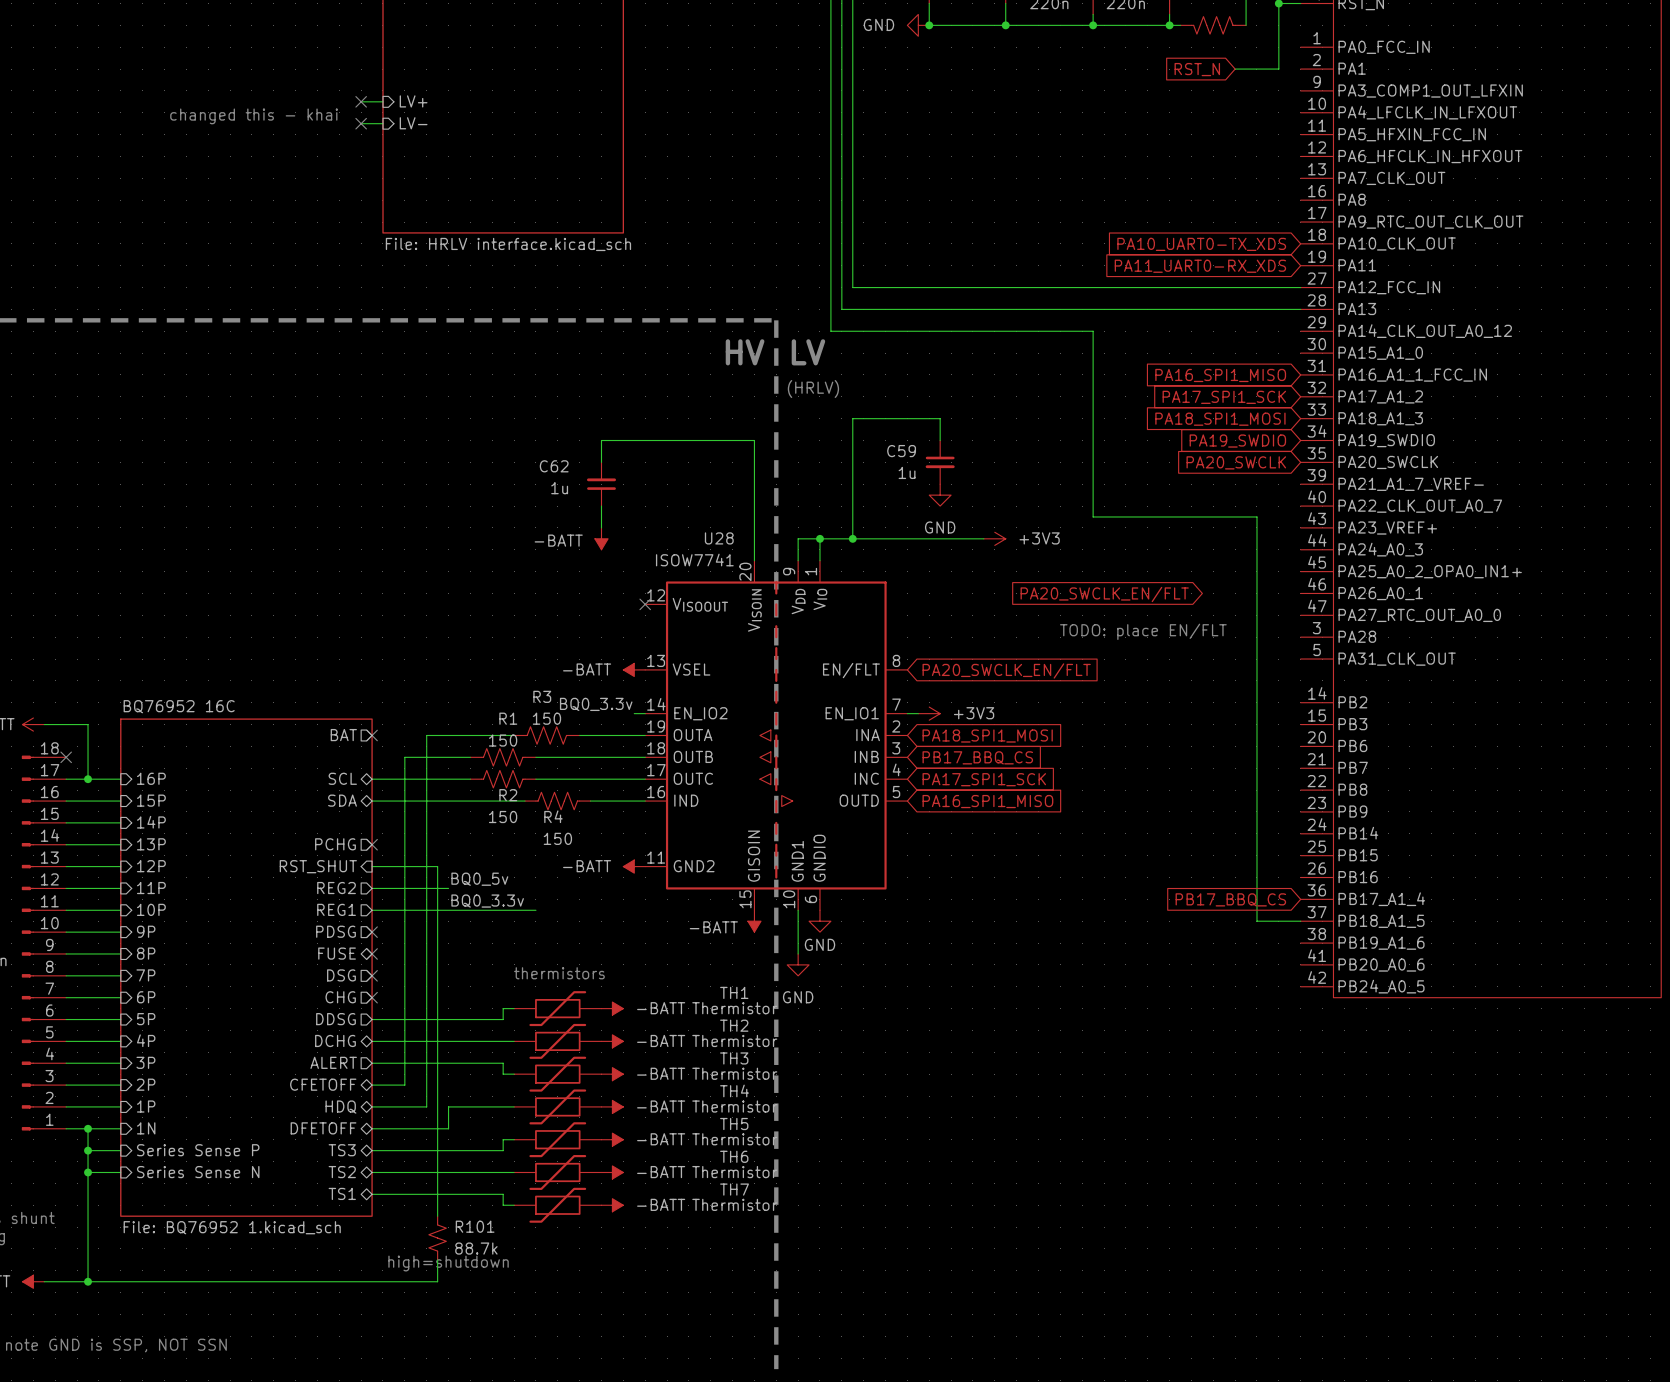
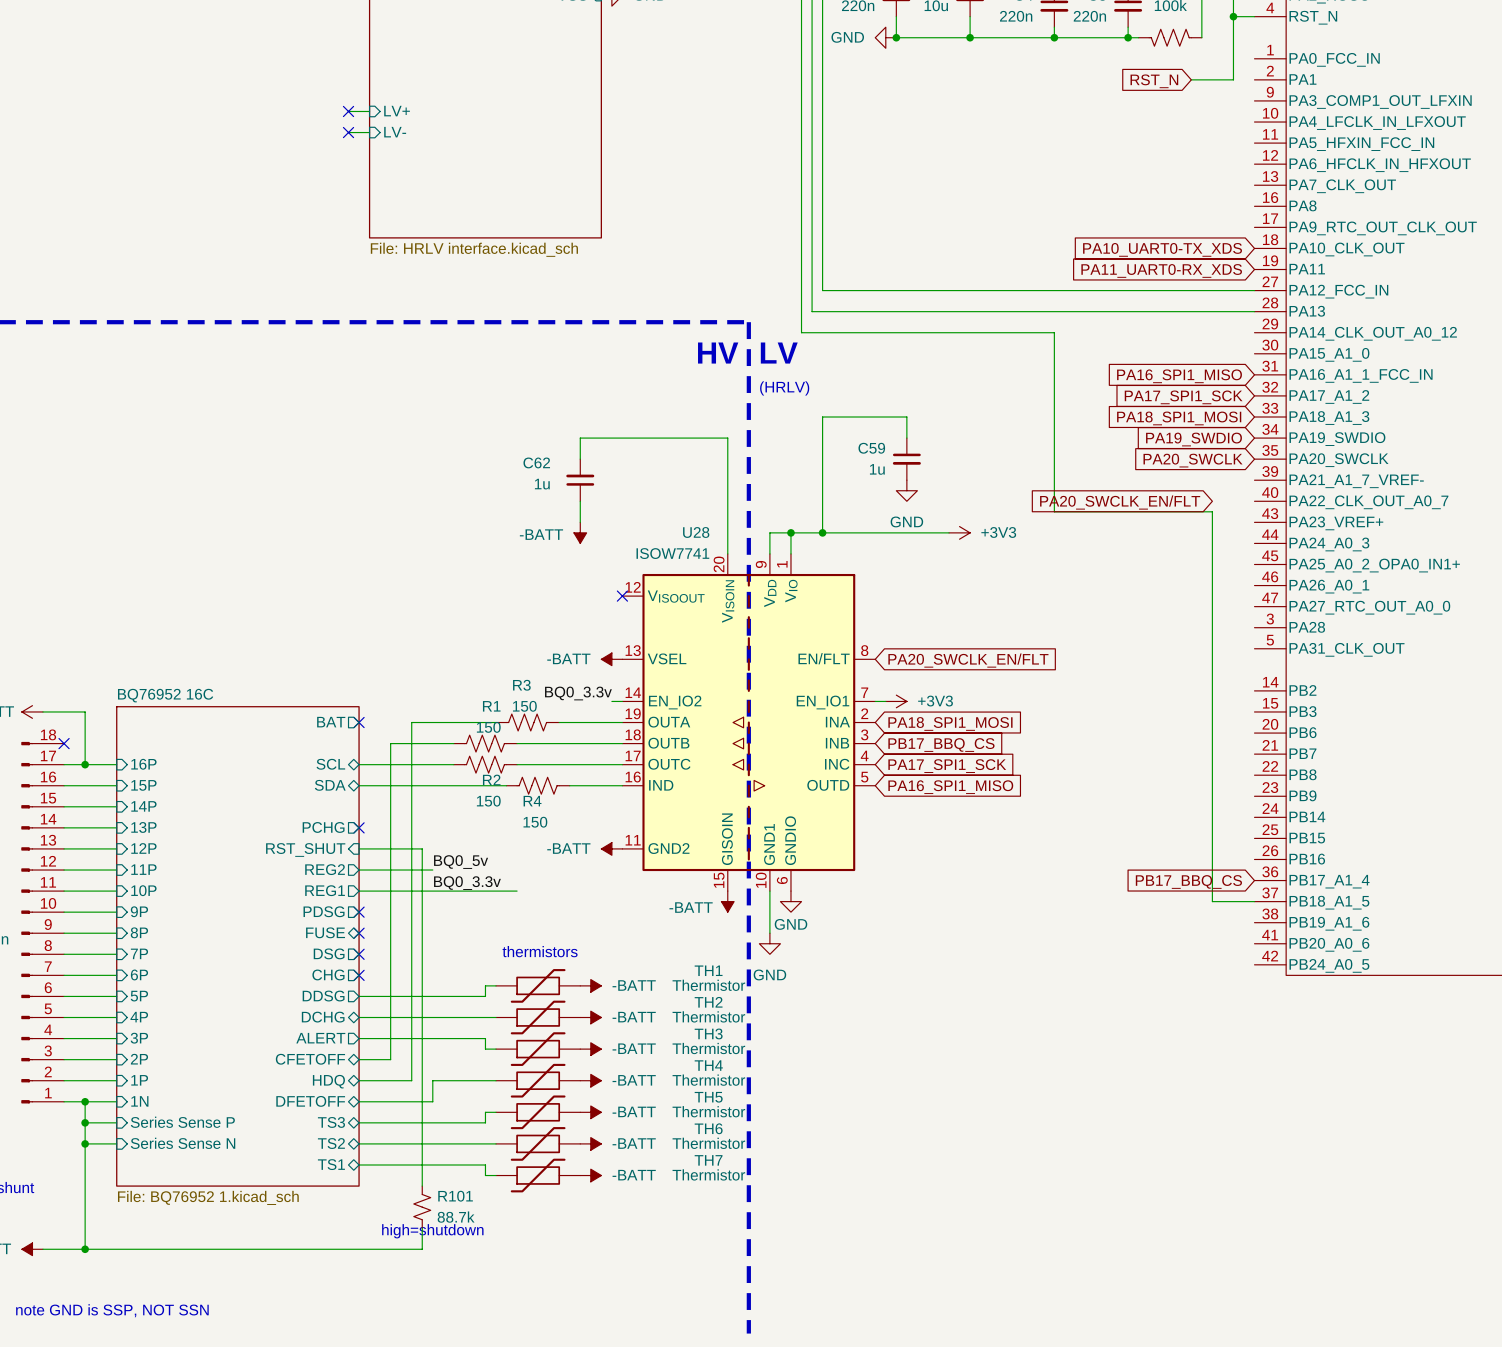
text: changed this - khai (254, 116) -> none
global label position: PA20_SWCLK_EN/FLT (1104, 594) -> PA20_SWCLK_EN/FLT (1120, 502)
text: TODO: place EN/FLT (1143, 631) -> none

